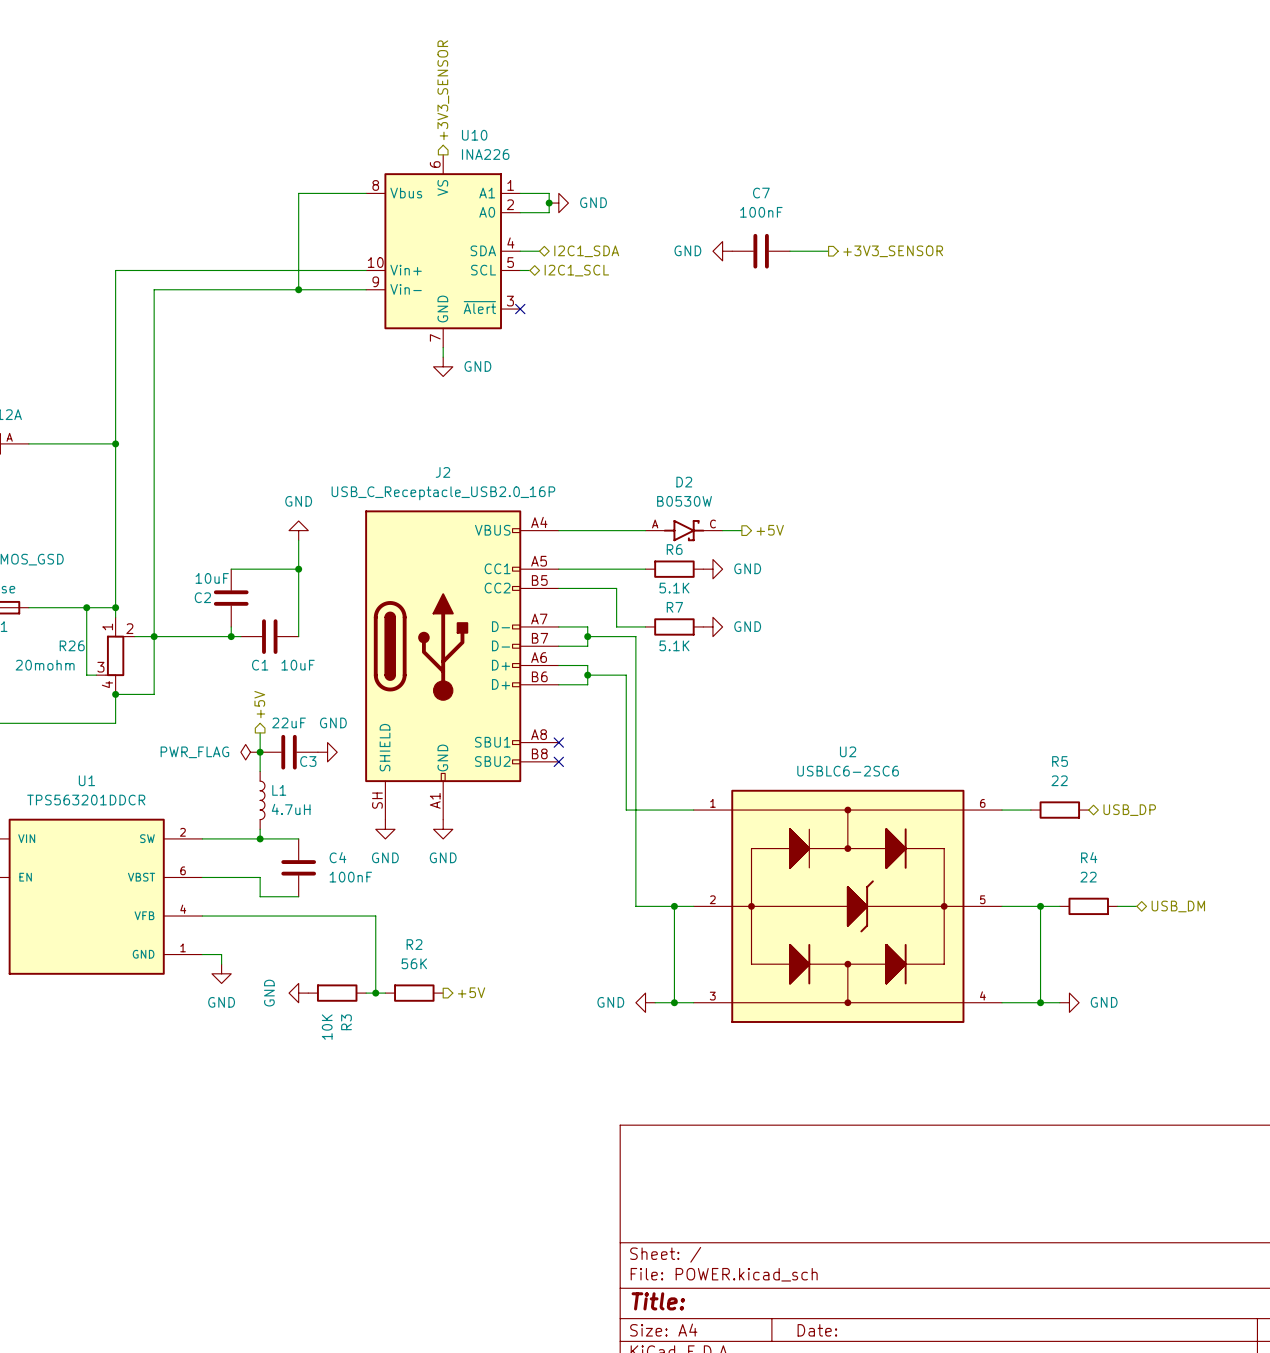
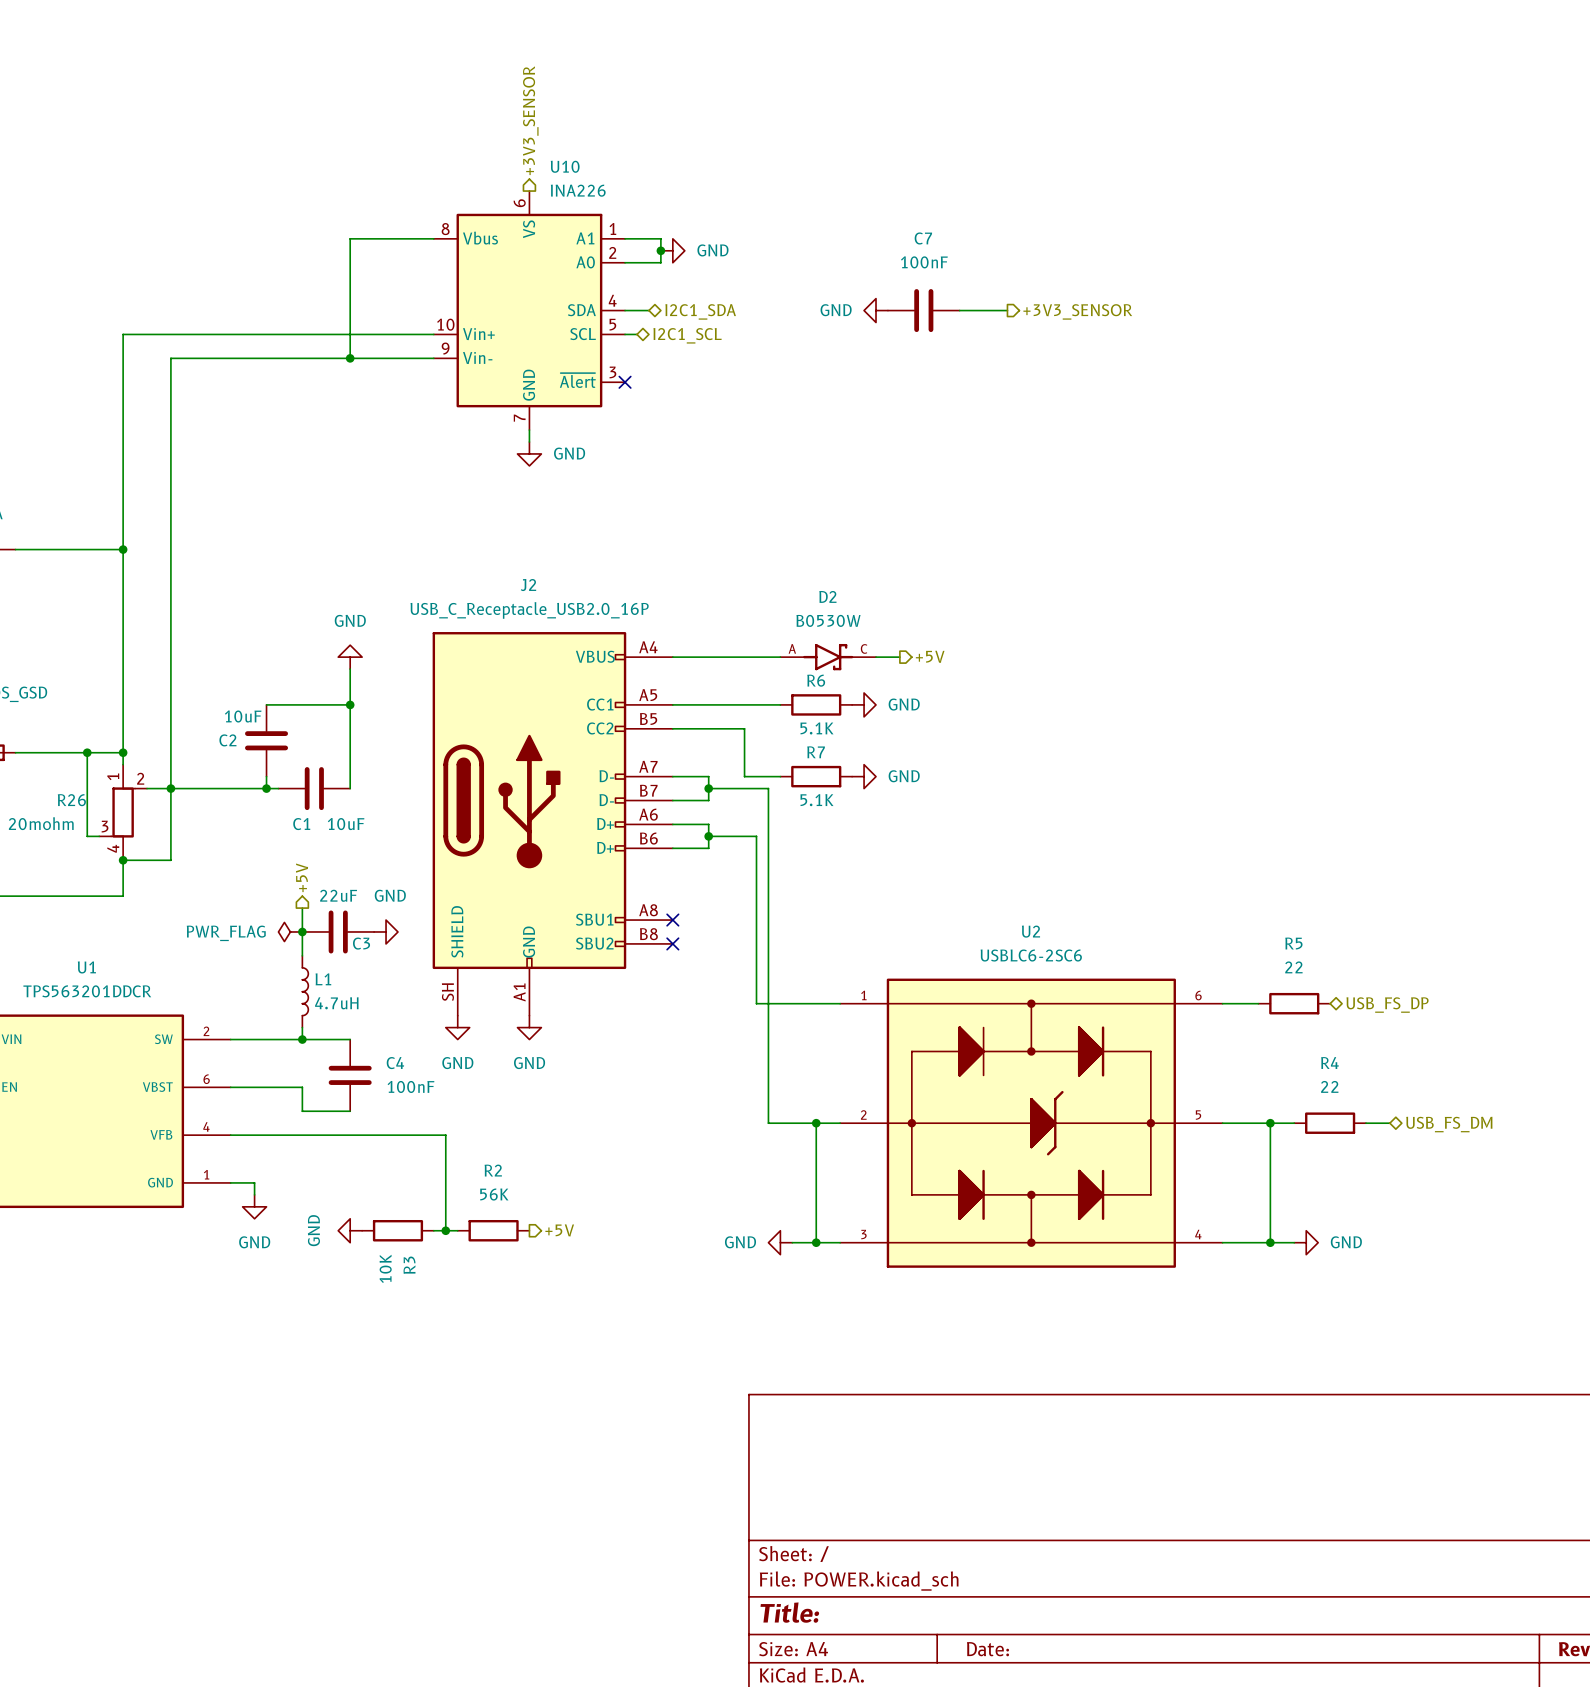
hierarchical label: USB_DP (1129, 810) -> USB_FS_DP (1387, 1005)
hierarchical label: USB_DM (1178, 906) -> USB_FS_DM (1449, 1124)

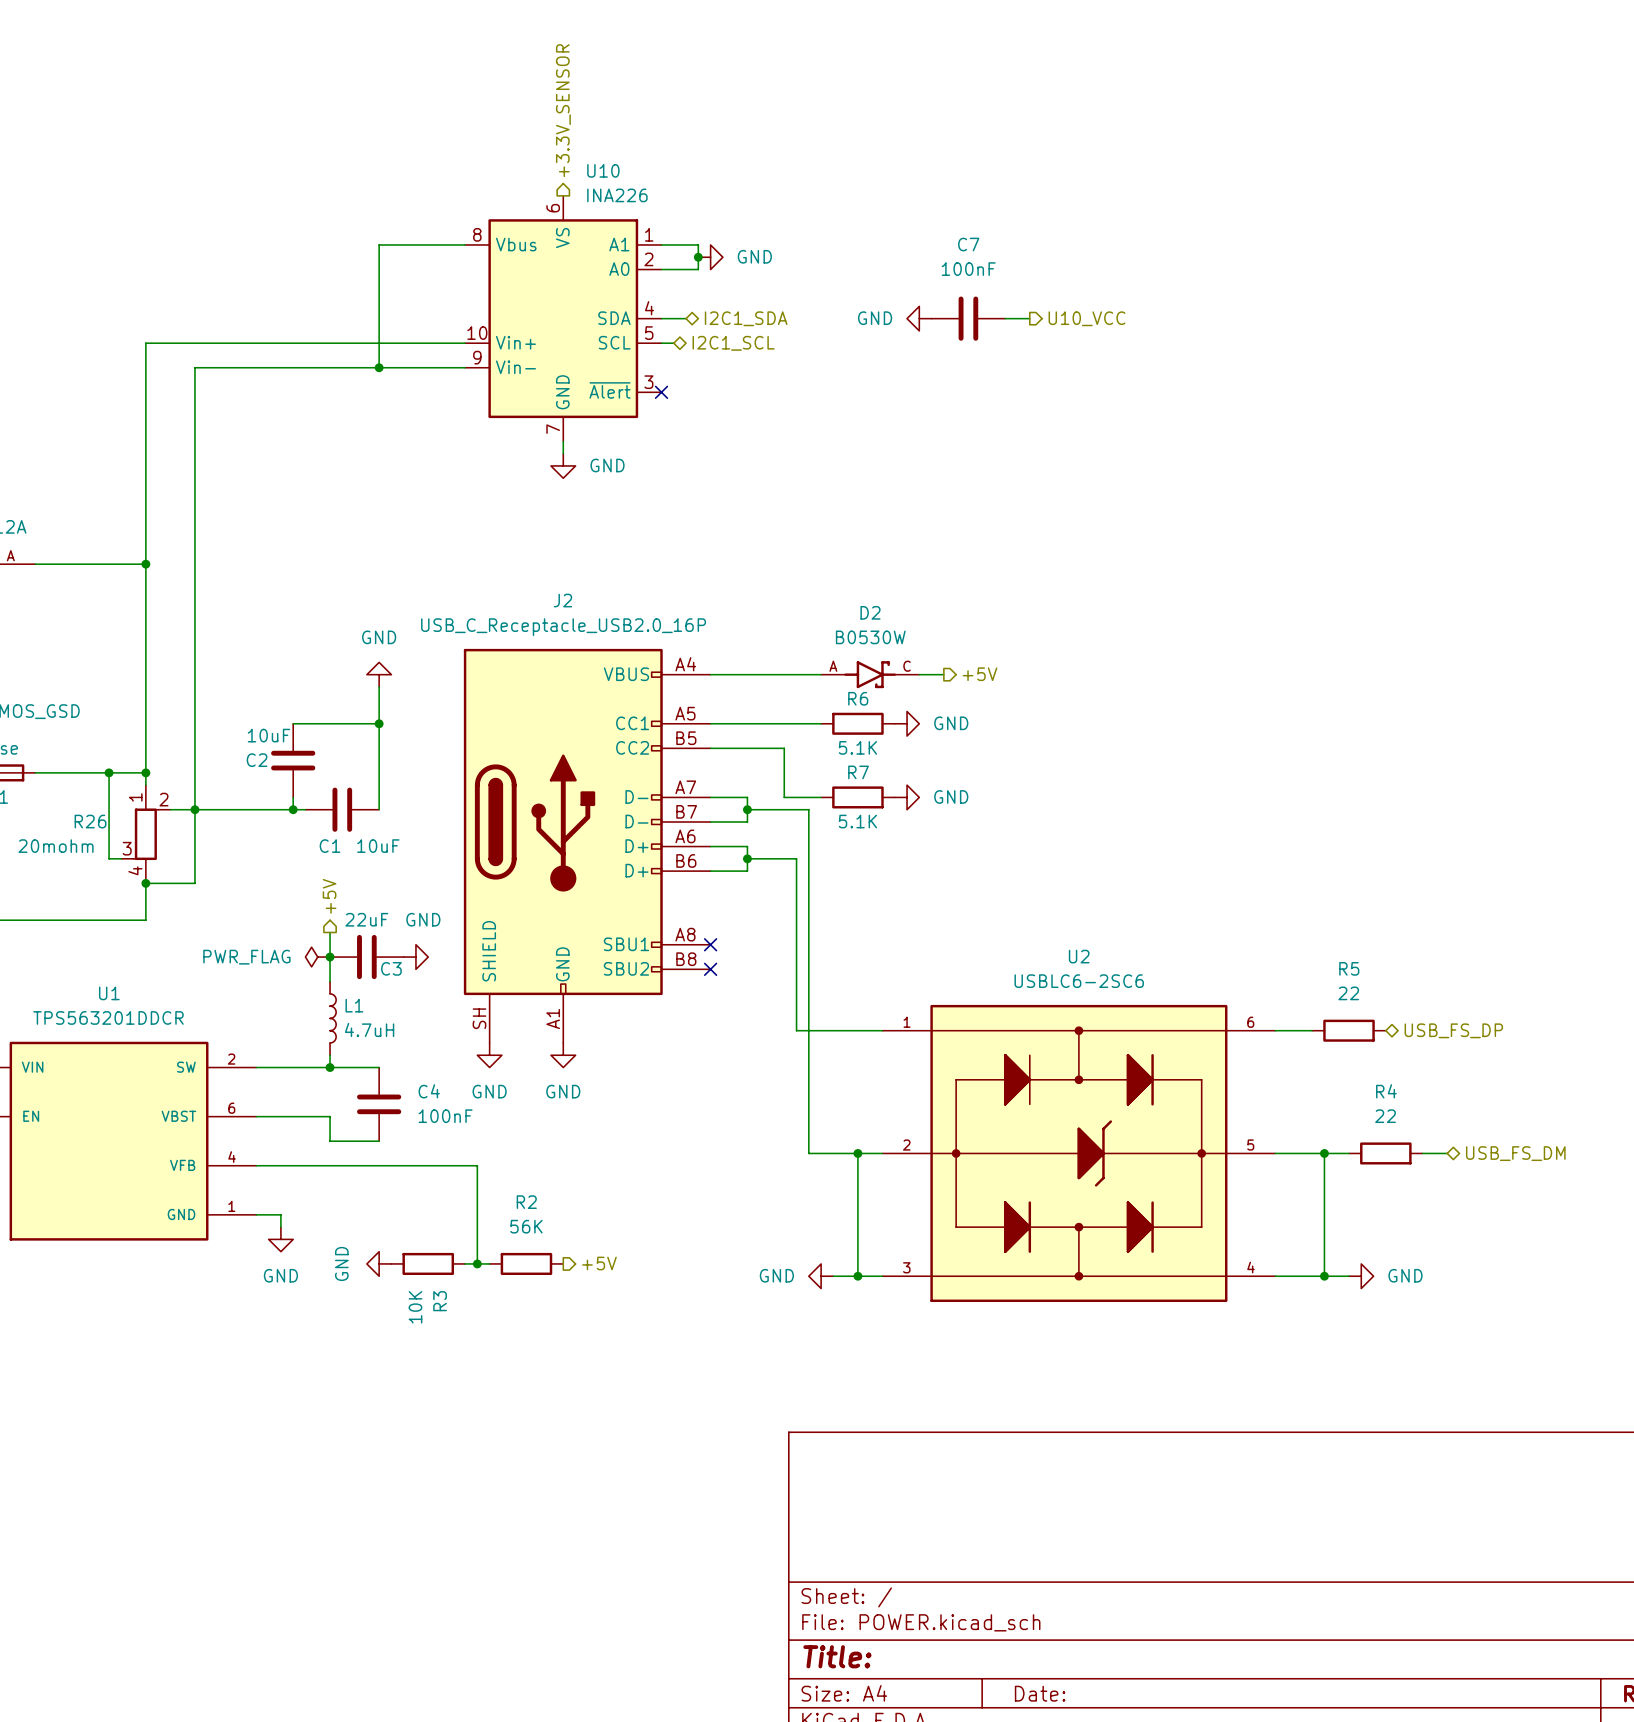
hierarchical label: +3V3_SENSOR (530, 120) -> +3.3V_SENSOR (563, 110)
wire: (983, 310) (1007, 310) -> none
hierarchical label: none -> U10_VCC (1086, 318)
hierarchical label: +3V3_SENSOR (1077, 311) -> none

